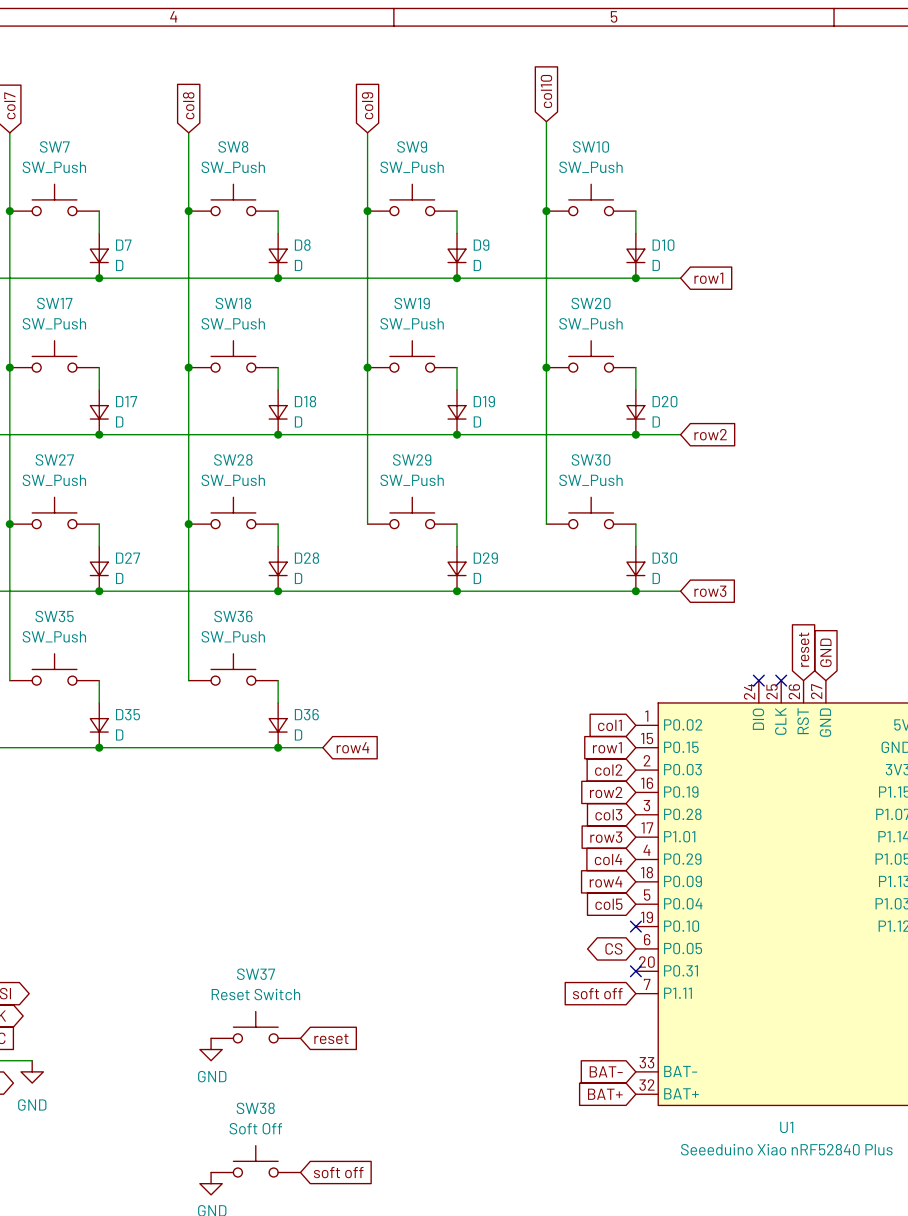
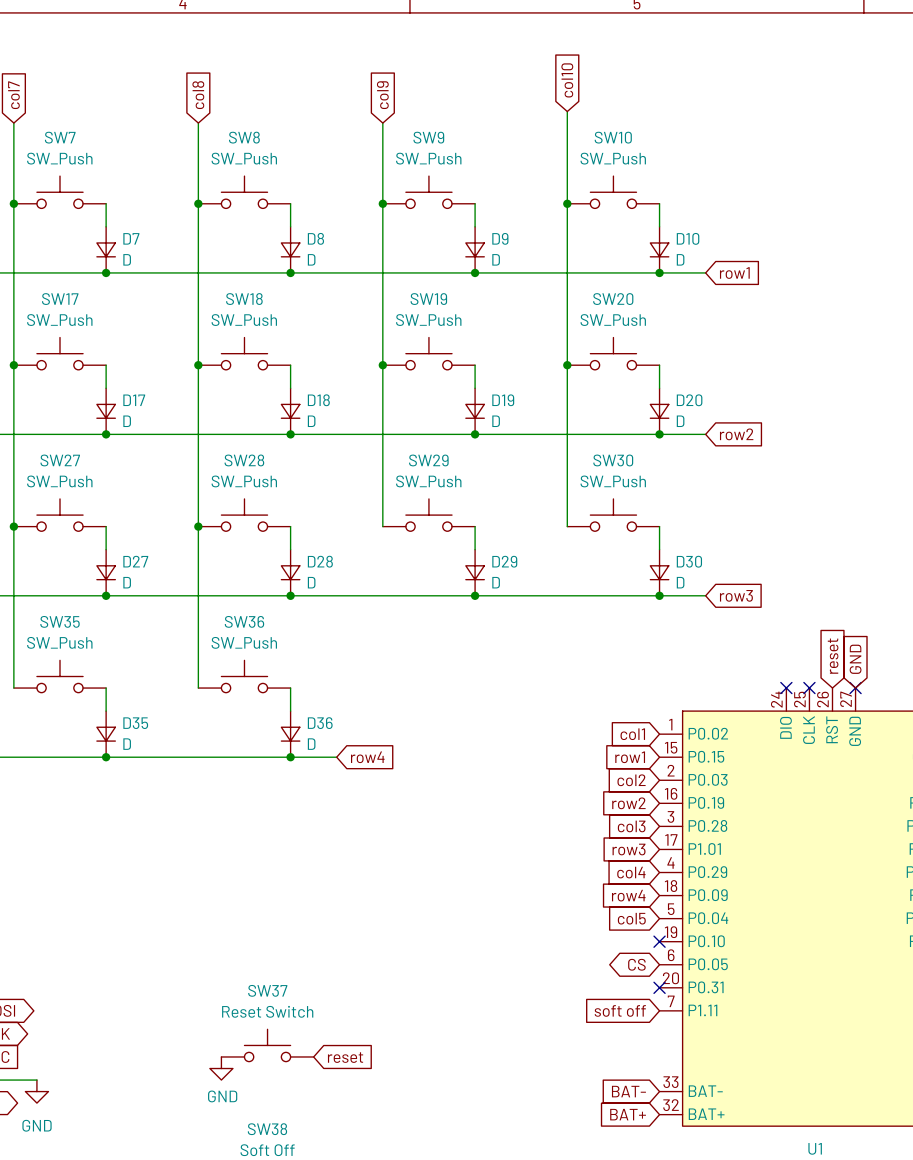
no-connect mark: none -> (855, 688)

